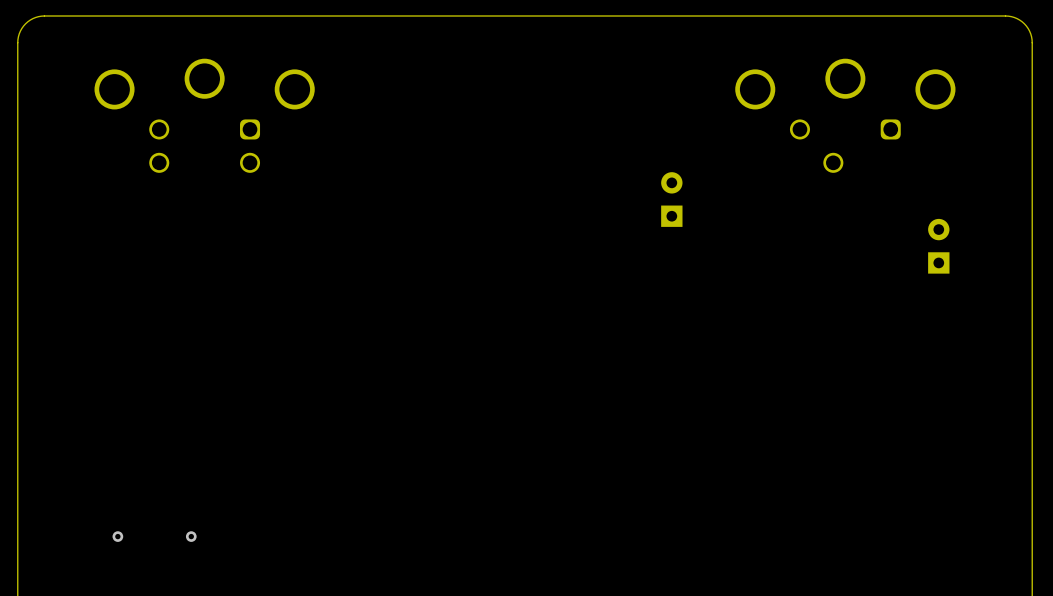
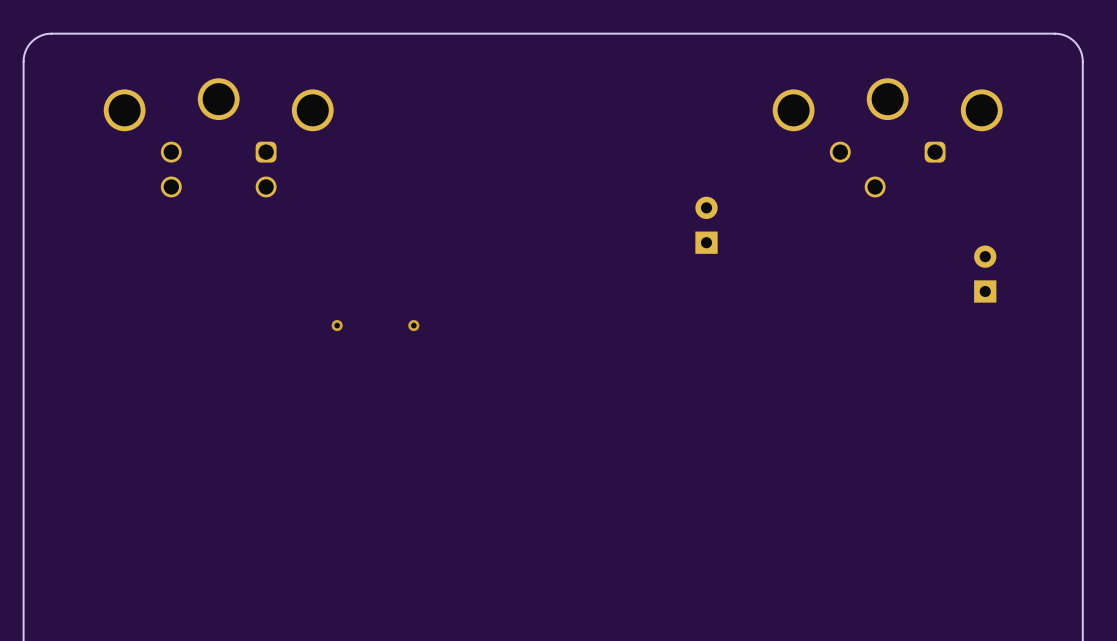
via: none -> (337, 325)
via: none -> (413, 325)
via: (117, 536) -> none
via: (191, 536) -> none

